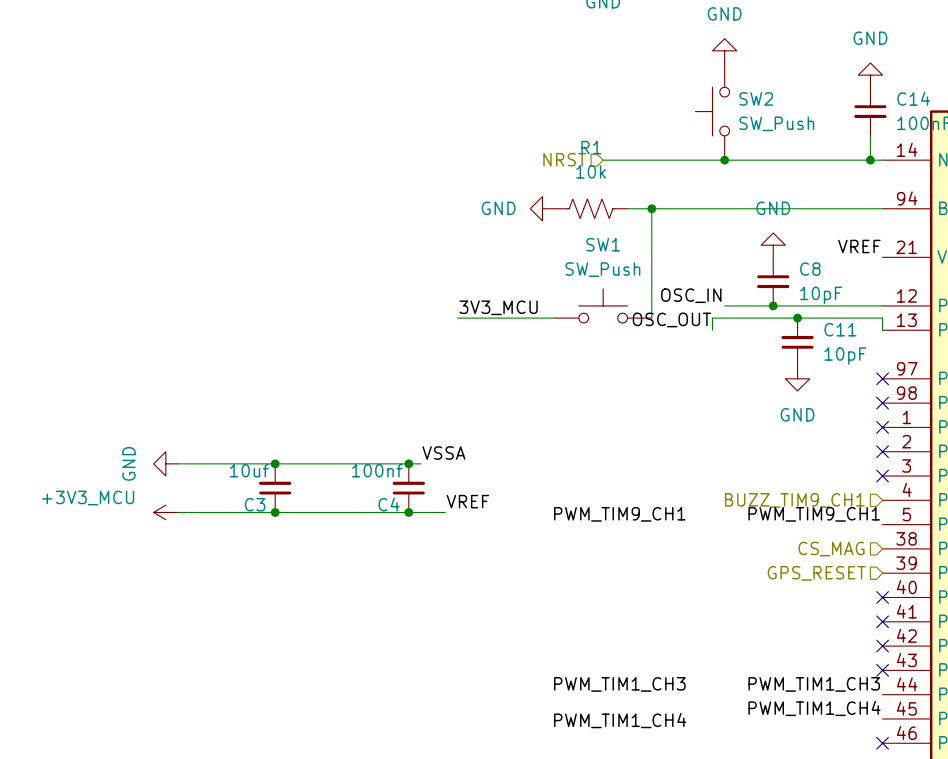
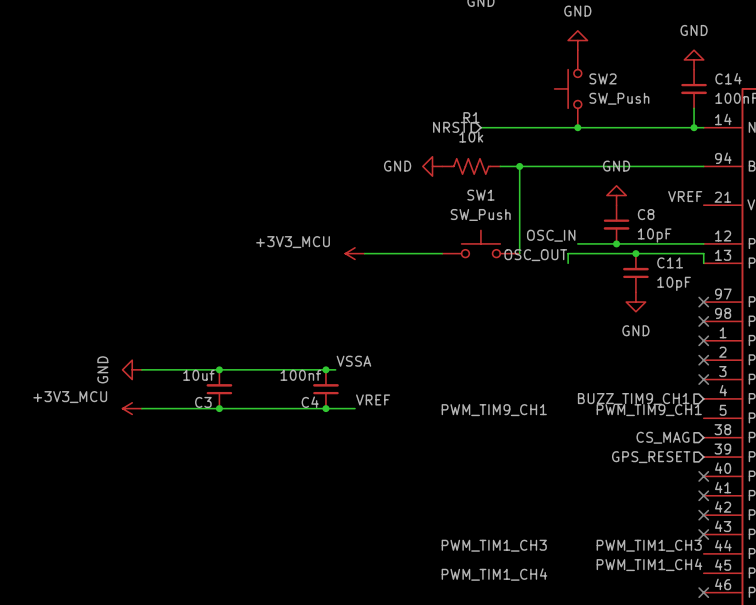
label: 3V3_MCU (498, 307) -> none
power symbol: none -> +3V3_MCU (355, 253)

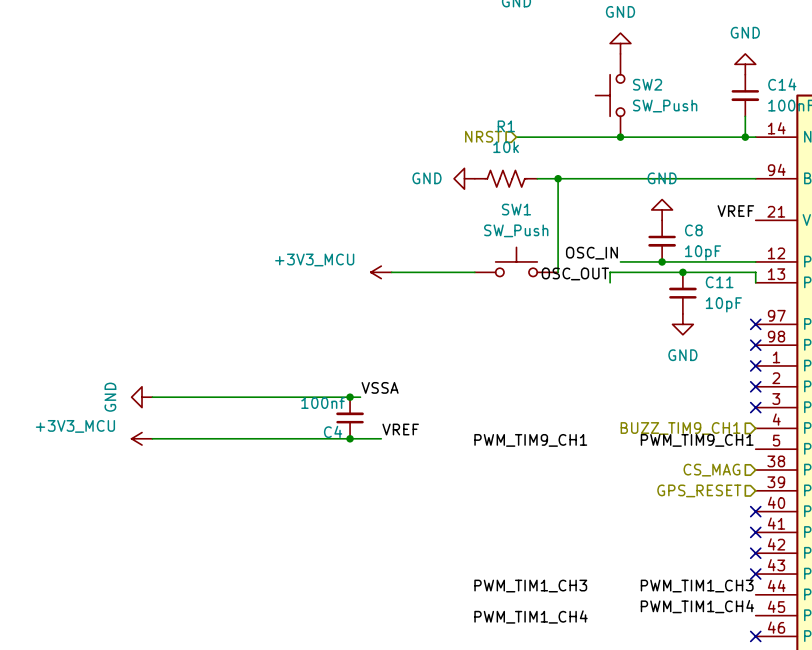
junction: (219, 369) -> none
C3: 10uf (219, 389) -> none
junction: (219, 408) -> none

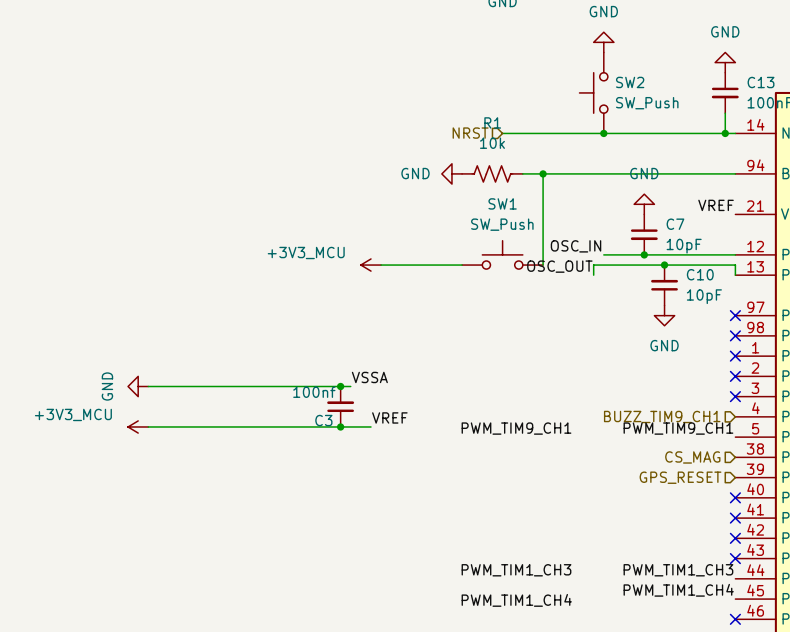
C14 name: C14 (782, 84) -> C13 (761, 82)
C8 name: C8 (693, 230) -> C7 (675, 224)
C11 name: C11 (719, 282) -> C10 (700, 274)
C4 name: C4 (333, 431) -> C3 (323, 420)

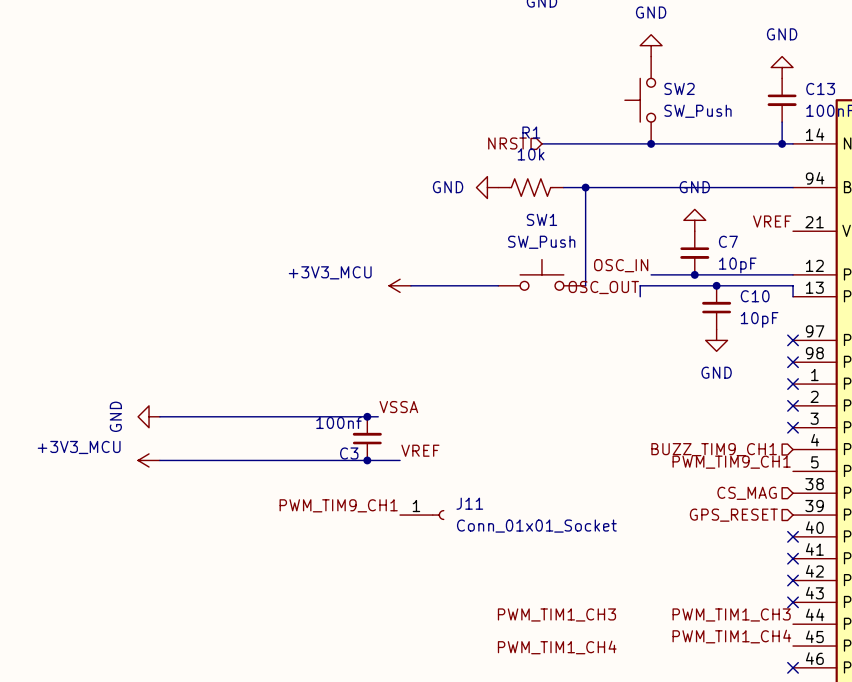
label: PWM_TIM9_CH1 (516, 428) -> none
label: none -> PWM_TIM9_CH1 (338, 505)
J11: none -> Conn_01x01_Socket (422, 515)

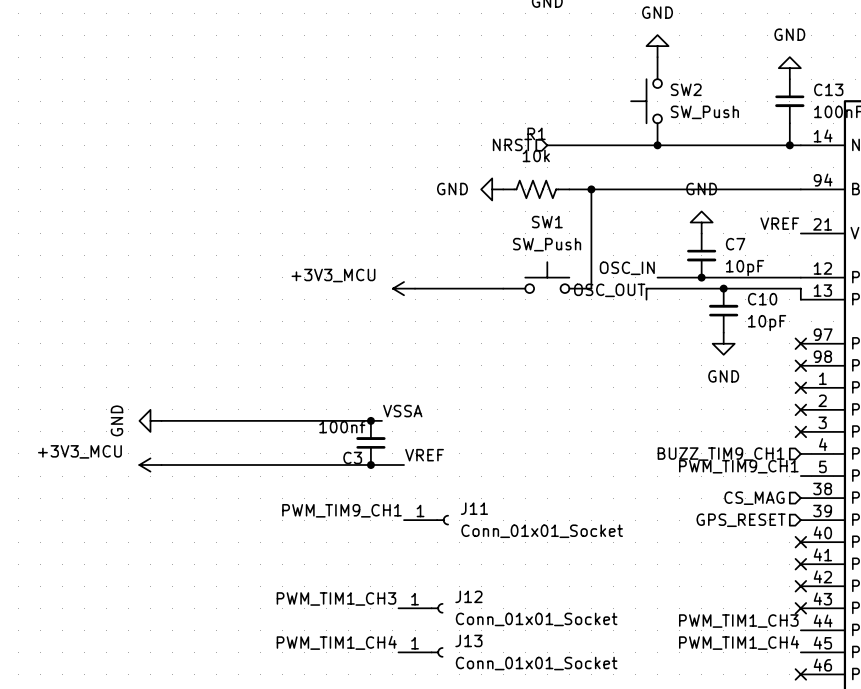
label: none -> PWM_TIM1_CH3 (336, 598)
J12: none -> Conn_01x01_Socket (420, 608)
label: PWM_TIM1_CH3 (556, 614) -> none
label: none -> PWM_TIM1_CH4 (336, 642)
J13: none -> Conn_01x01_Socket (420, 652)
label: PWM_TIM1_CH4 (557, 647) -> none

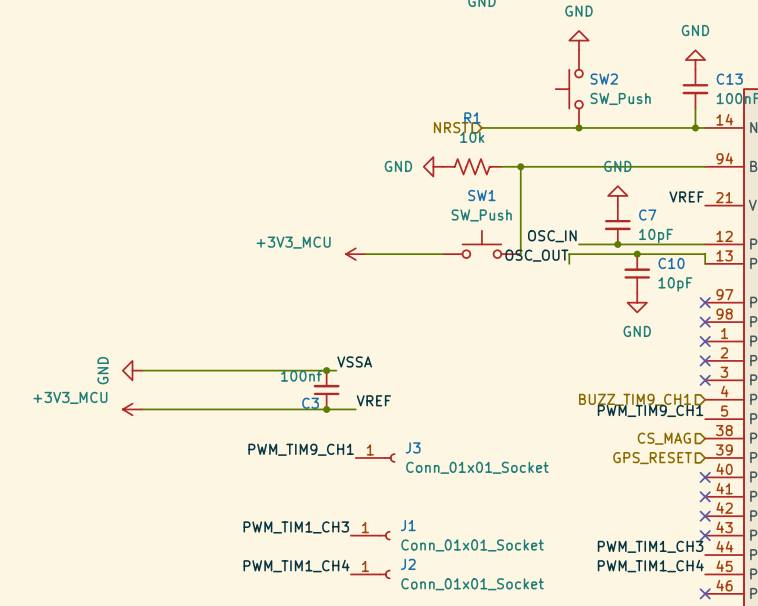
J11 name: J11 (474, 508) -> J3 (413, 447)
J12 name: J12 (468, 596) -> J1 (408, 525)
J13 name: J13 (468, 640) -> J2 (408, 564)

